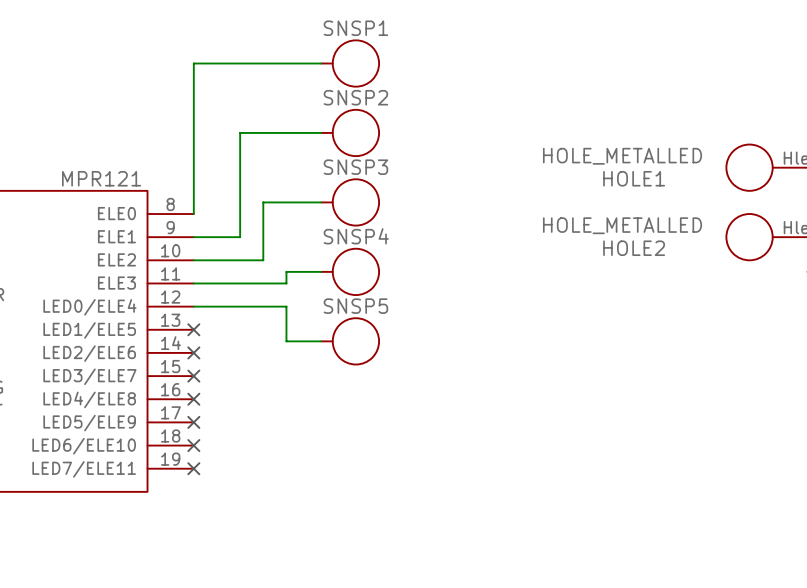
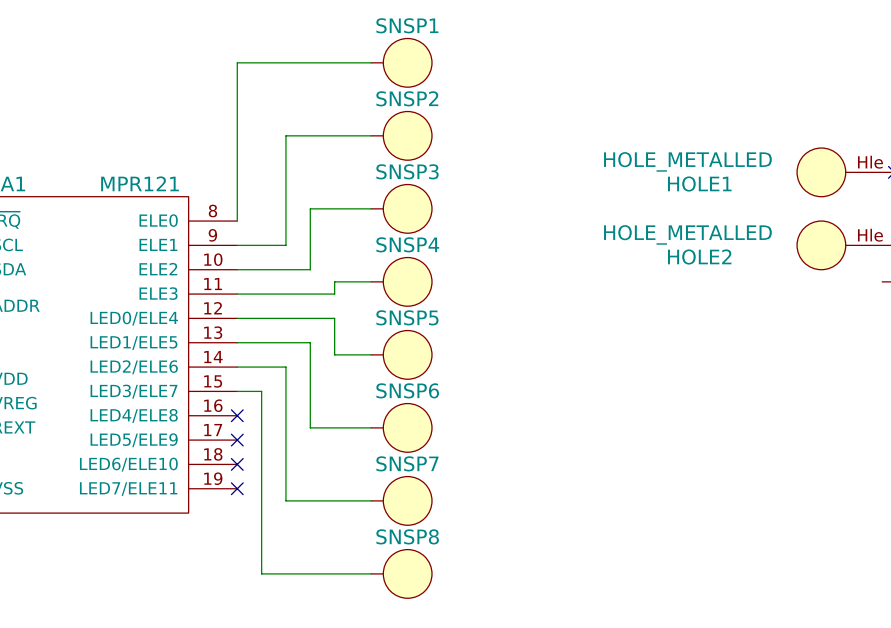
wire: none -> (237, 342) (310, 342) (310, 427) (371, 427)
no-connect mark: (193, 329) -> none
wire: none -> (237, 367) (285, 367) (285, 500) (371, 500)
no-connect mark: (193, 352) -> none
wire: none -> (237, 391) (261, 391) (261, 573) (371, 573)
no-connect mark: (193, 376) -> none
SNSP6: none -> (401, 427)
SNSP7: none -> (401, 500)
SNSP8: none -> (401, 573)

